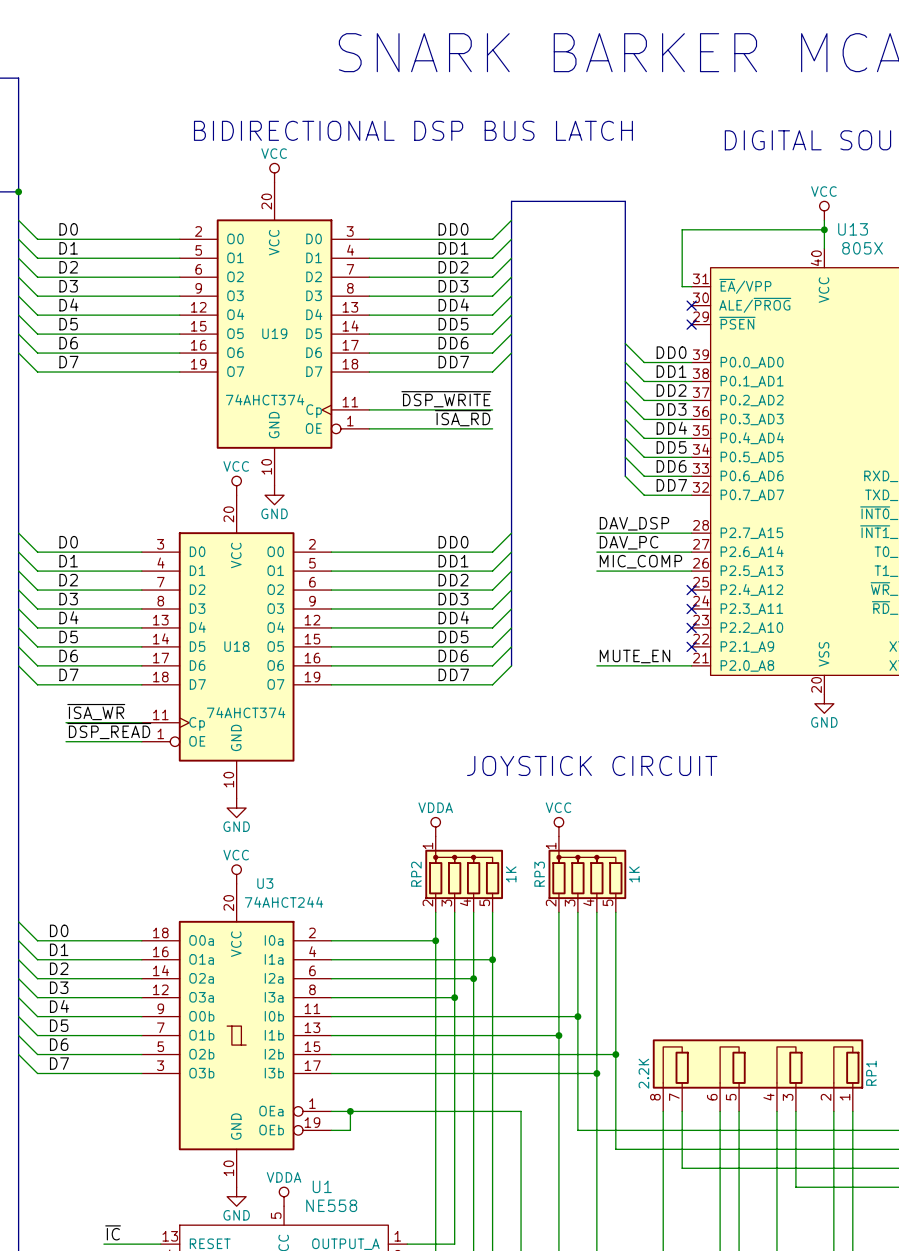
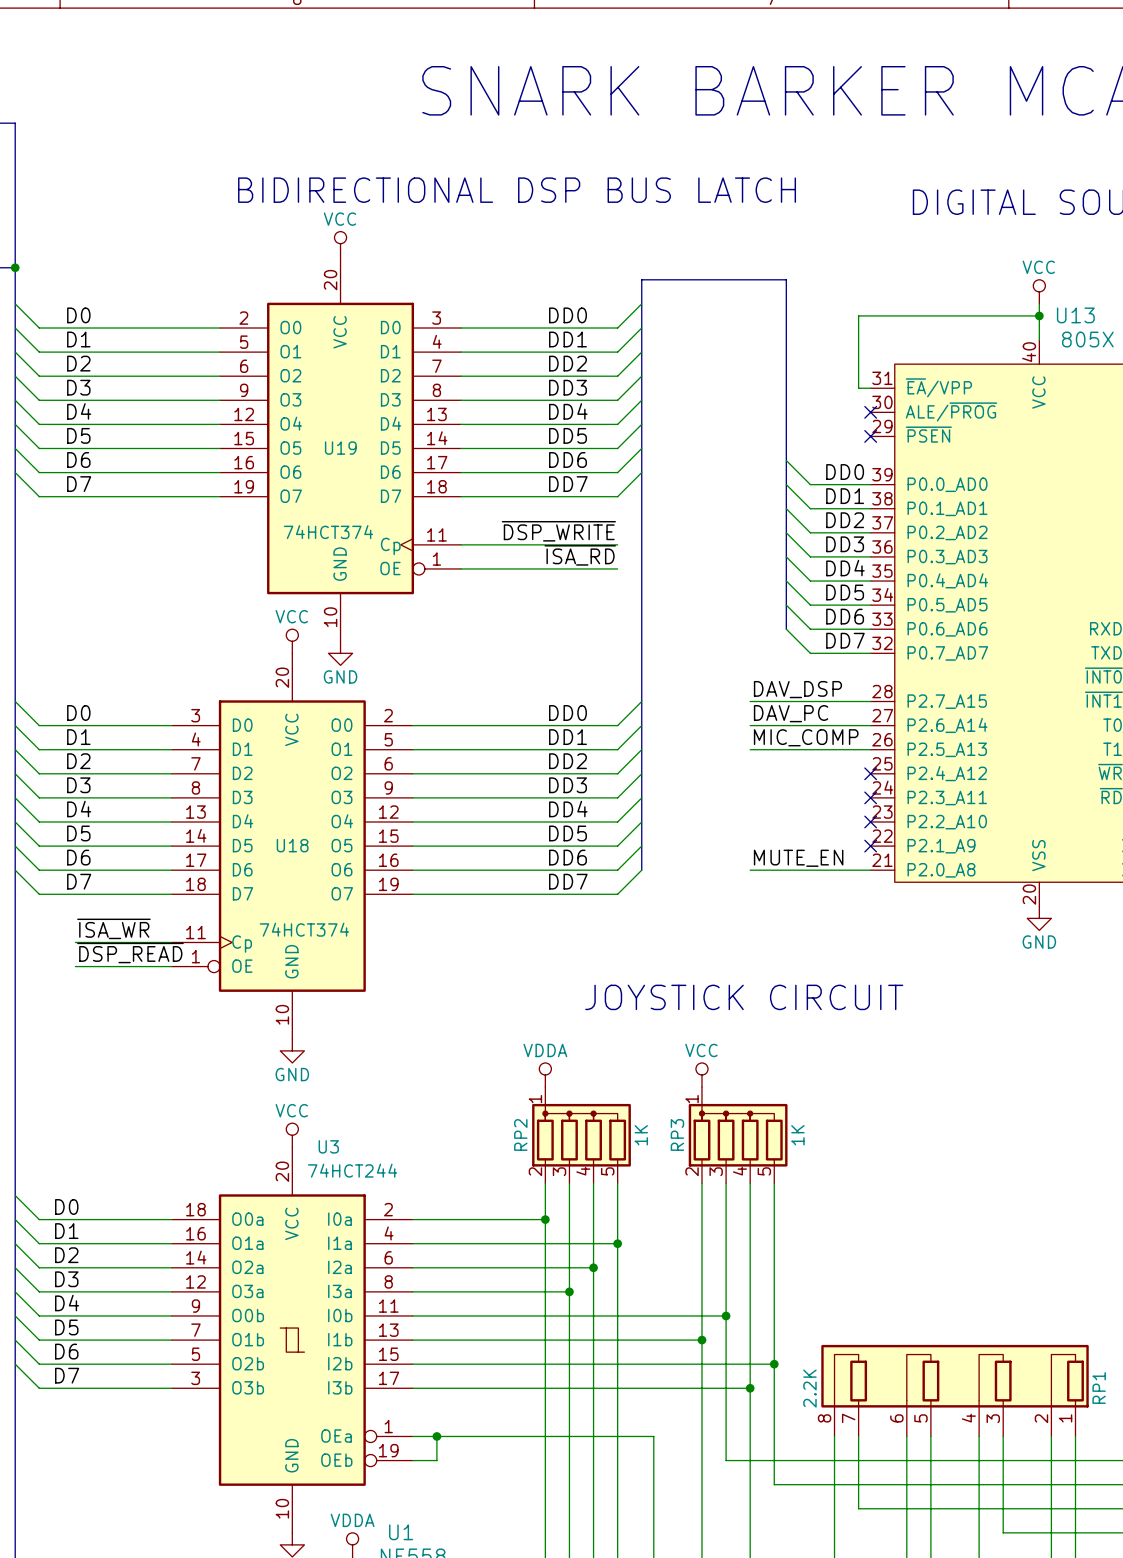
U19 value: 74AHCT374 (265, 399) -> 74HCT374 (328, 532)
U18 value: 74AHCT374 (246, 712) -> 74HCT374 (304, 929)
U3 value: 74AHCT244 (284, 902) -> 74HCT244 (352, 1170)

